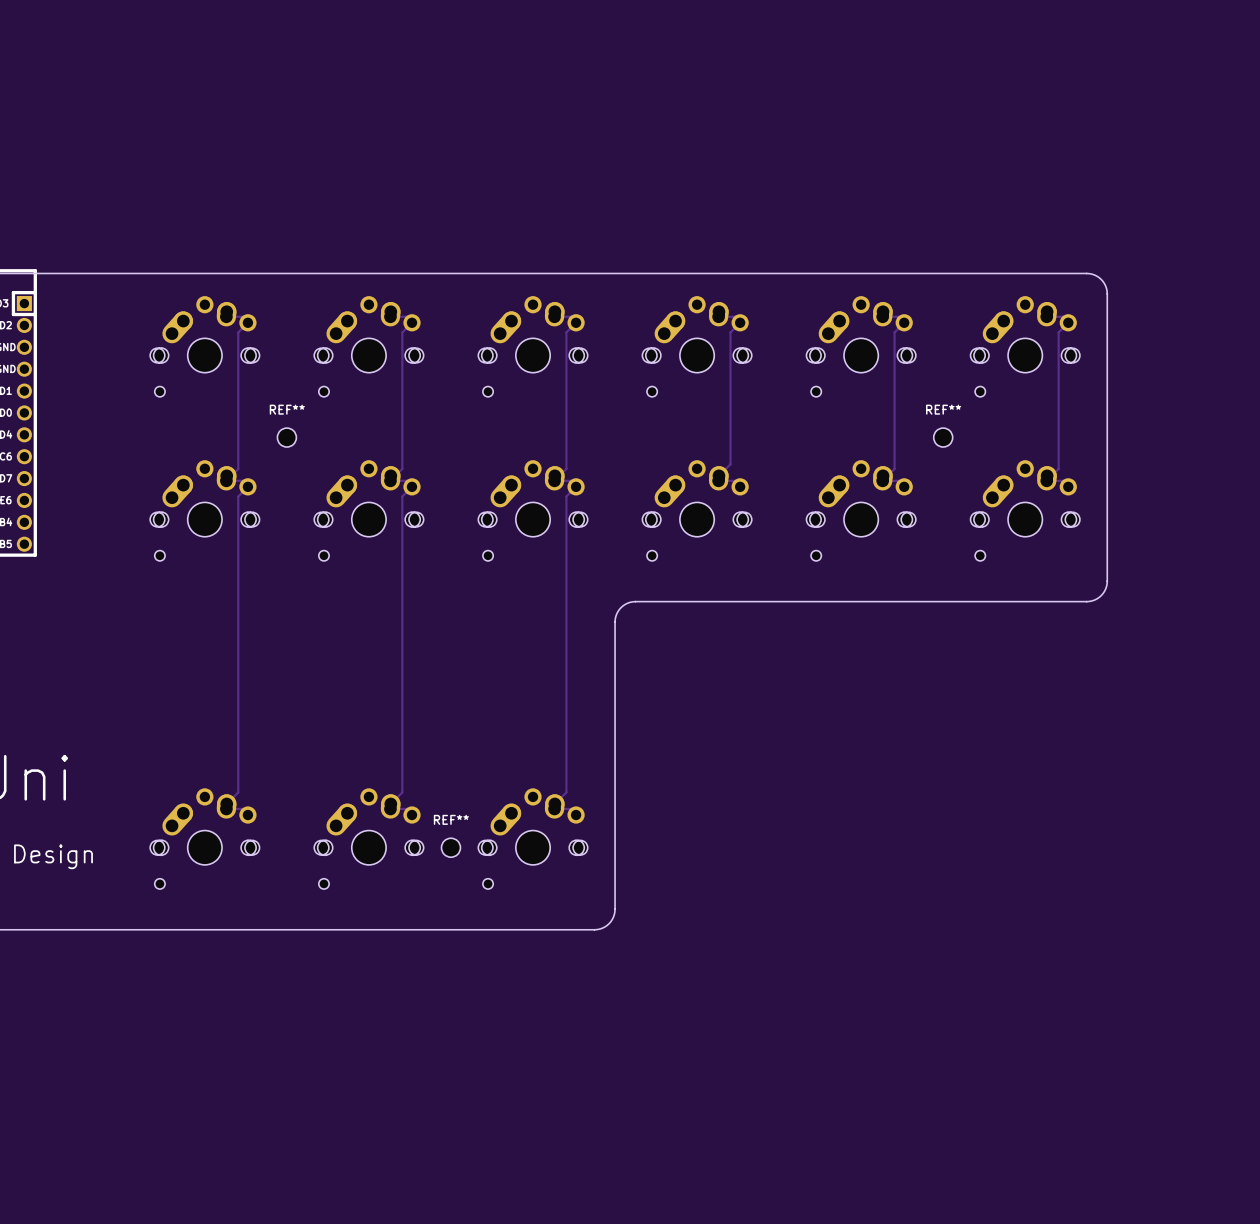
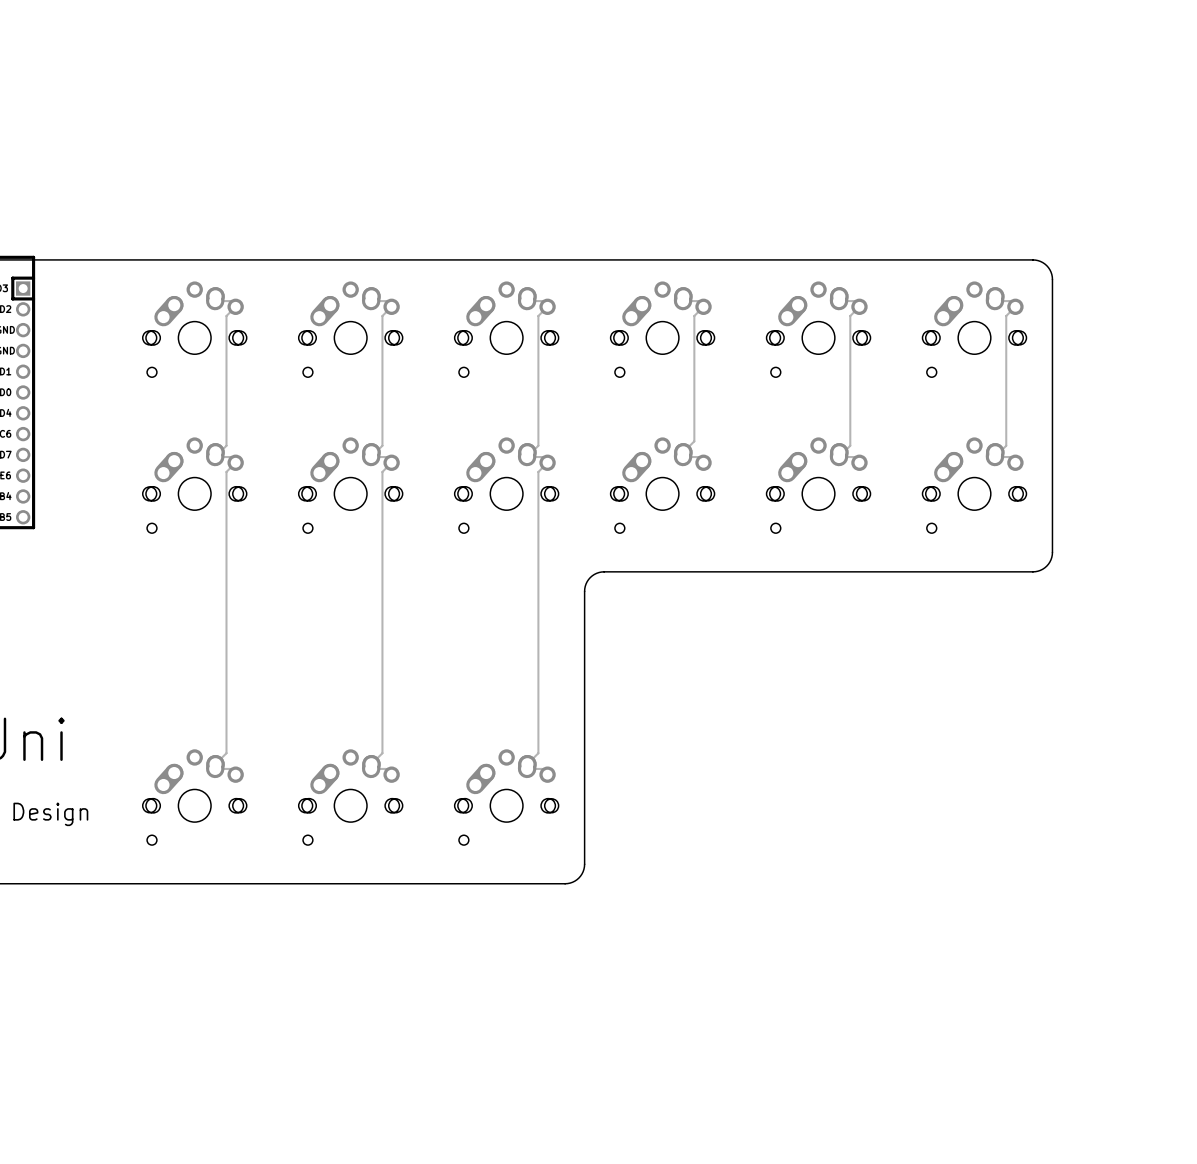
REF**: (286, 437) -> none
REF**: (943, 437) -> none
REF**: (450, 847) -> none

